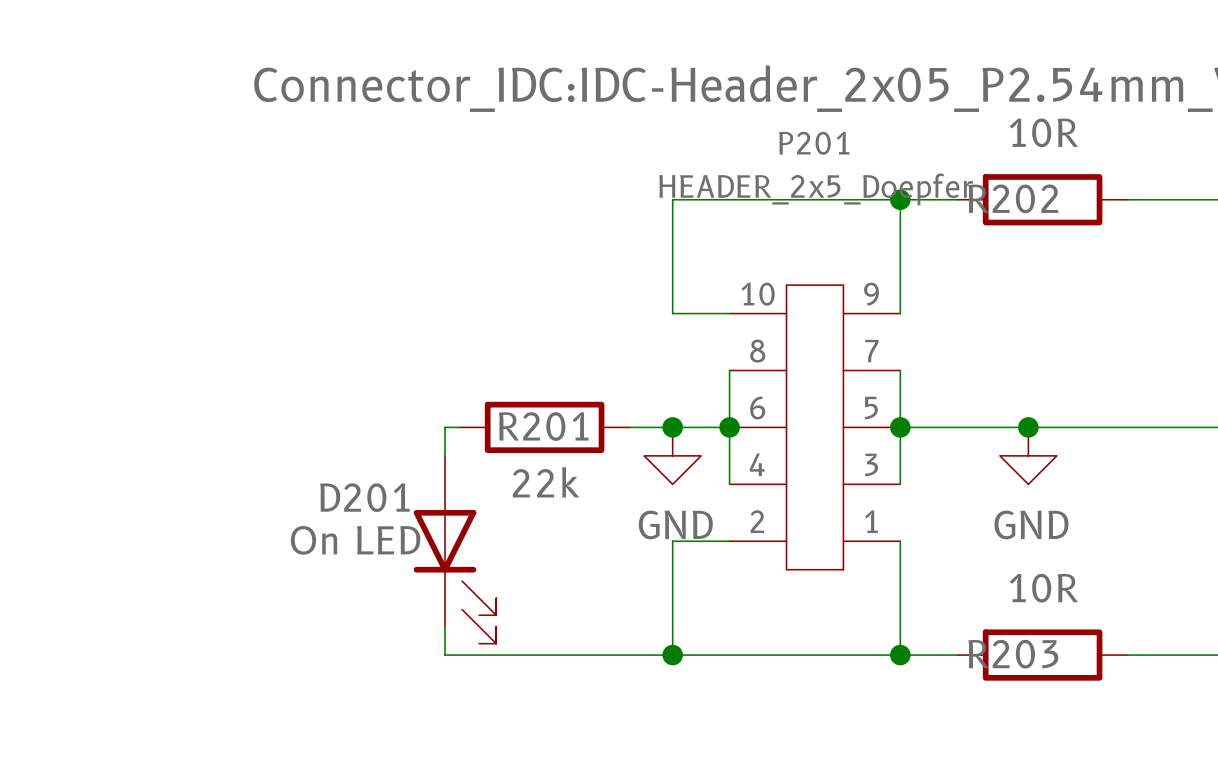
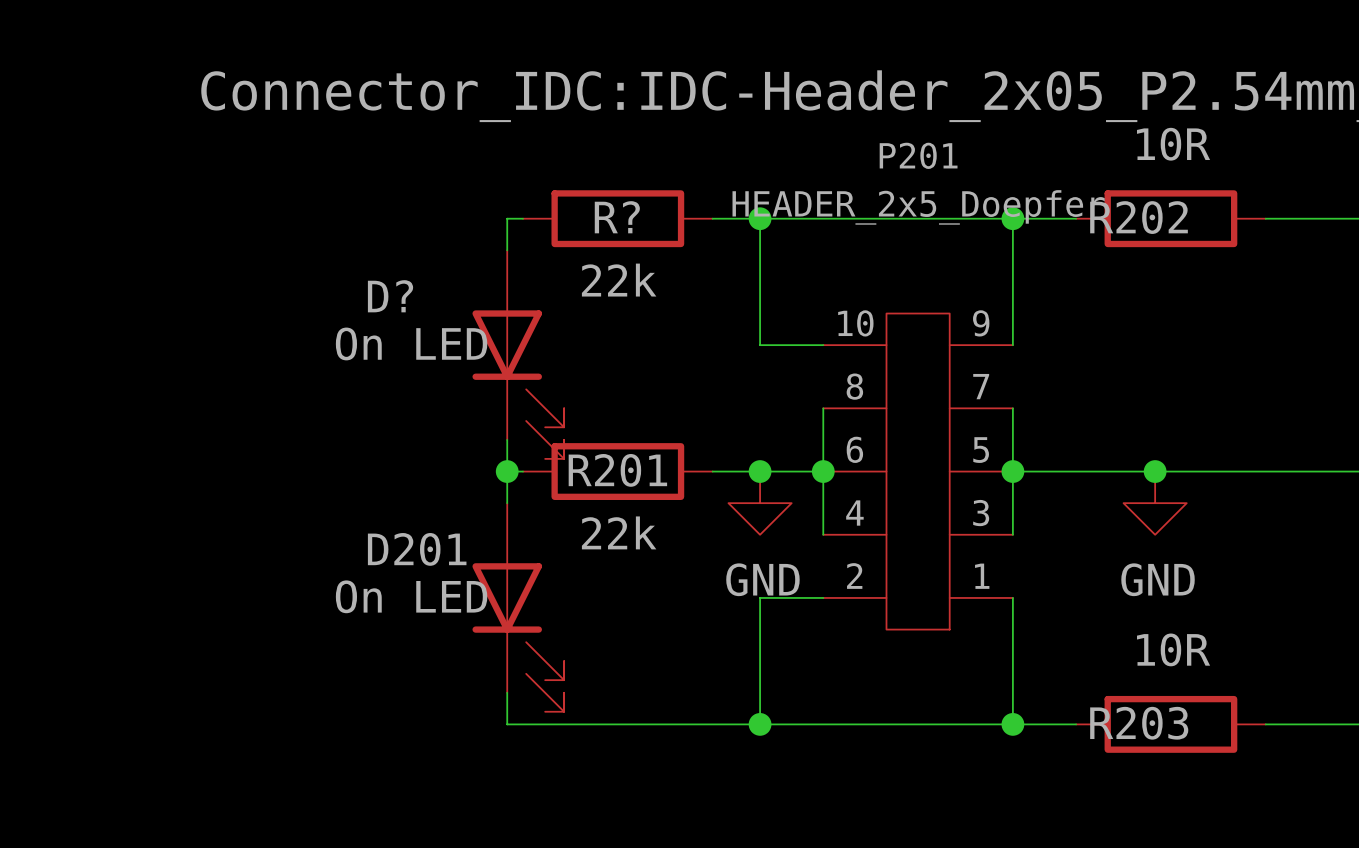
wire: none -> (523, 218) (507, 218) (507, 250)
R?: none -> 22k (617, 218)
wire: none -> (712, 218) (760, 218)
junction: none -> (760, 218)
D?: none -> On LED (518, 354)
wire: none -> (507, 439) (507, 471)
junction: none -> (507, 471)

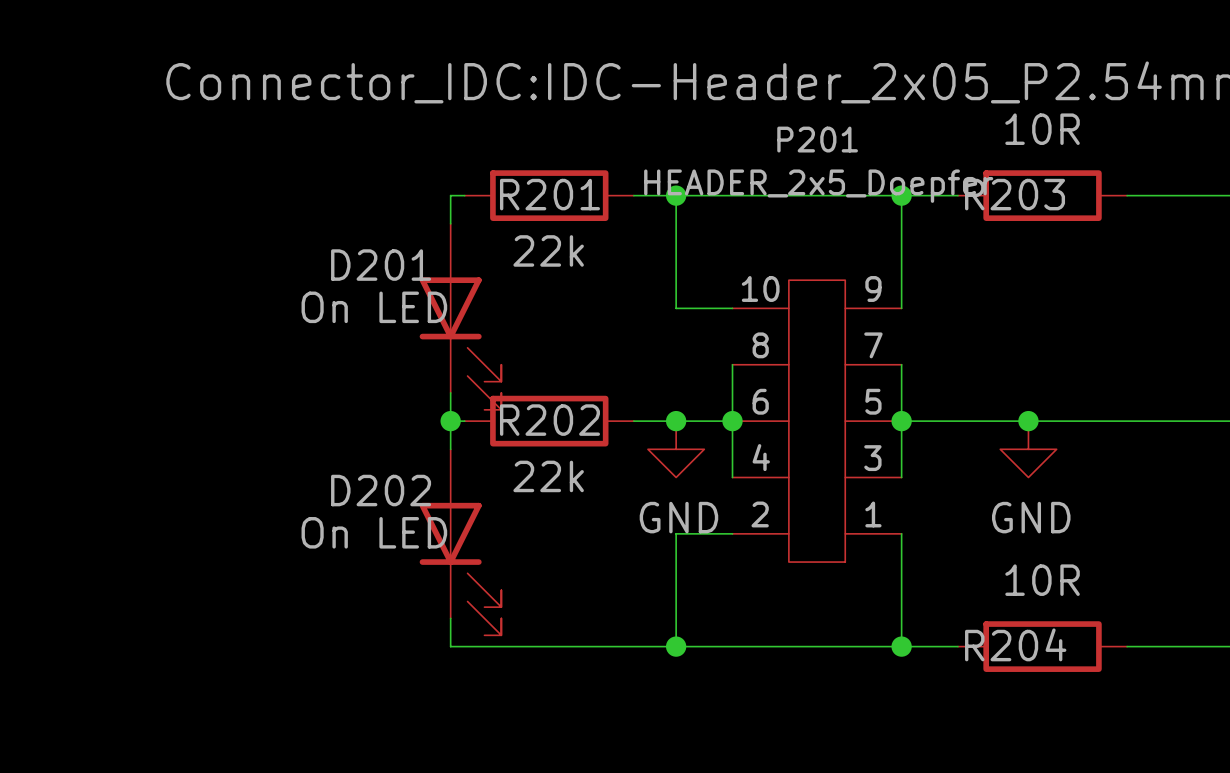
R? name: R? (617, 217) -> R201 (549, 194)
R202 name: R202 (1139, 217) -> R203 (1015, 194)
D? name: D? (390, 296) -> D201 (381, 265)
R201 name: R201 (617, 470) -> R202 (549, 420)
D201 name: D201 (417, 549) -> D202 (381, 490)
R203 name: R203 (1139, 723) -> R204 (1015, 644)

